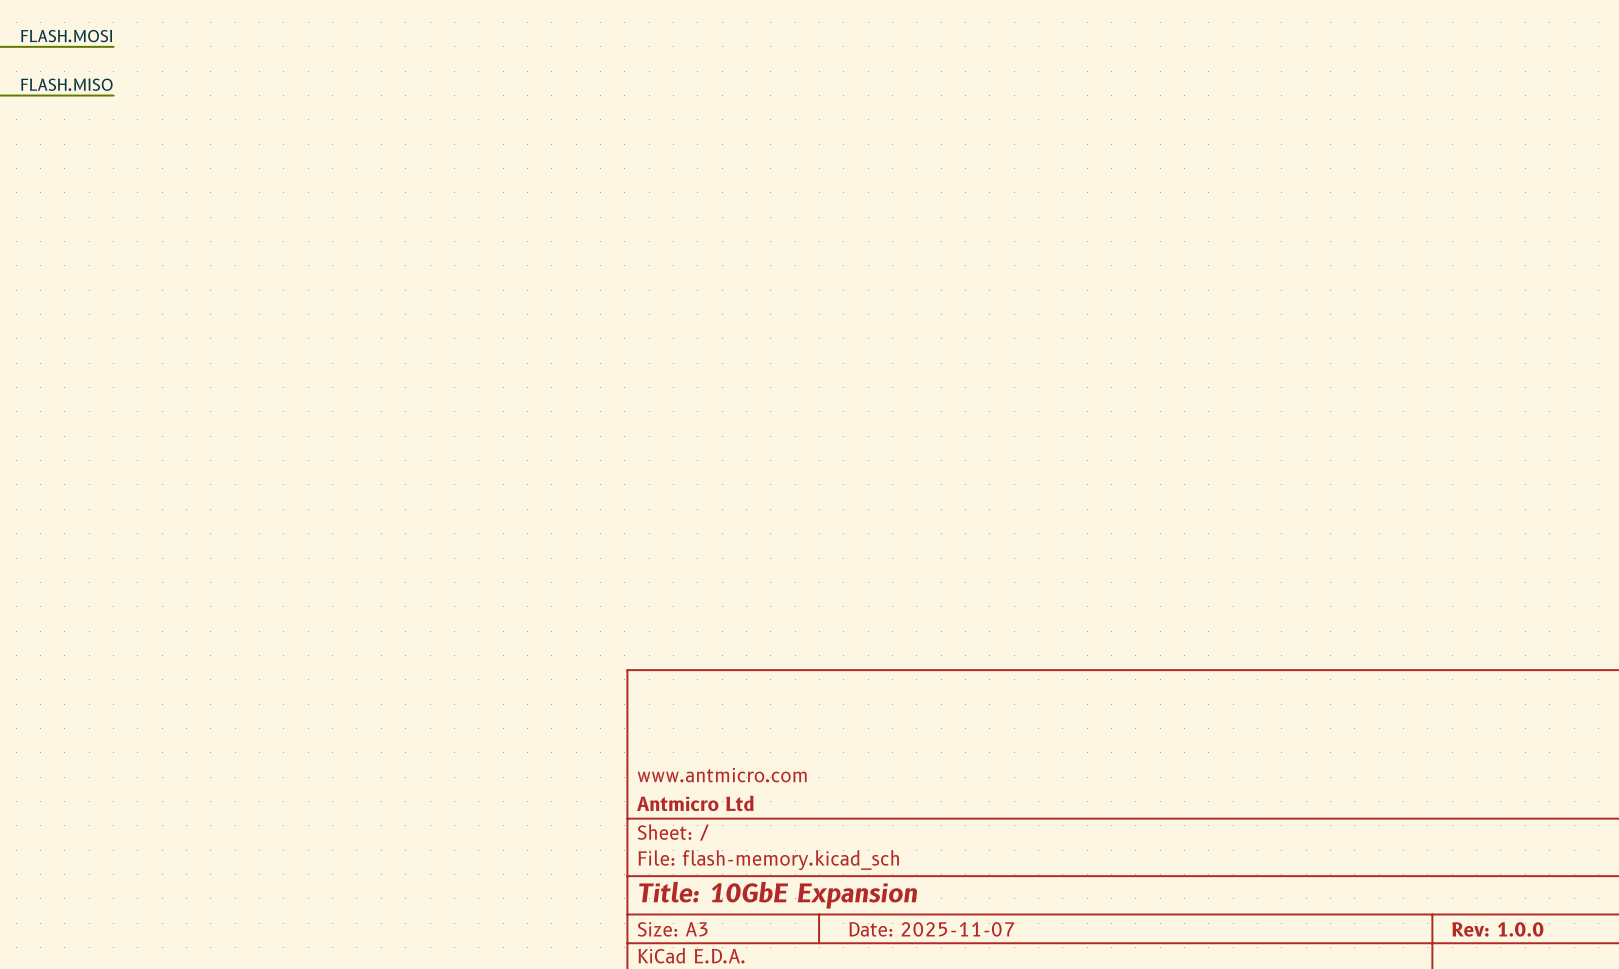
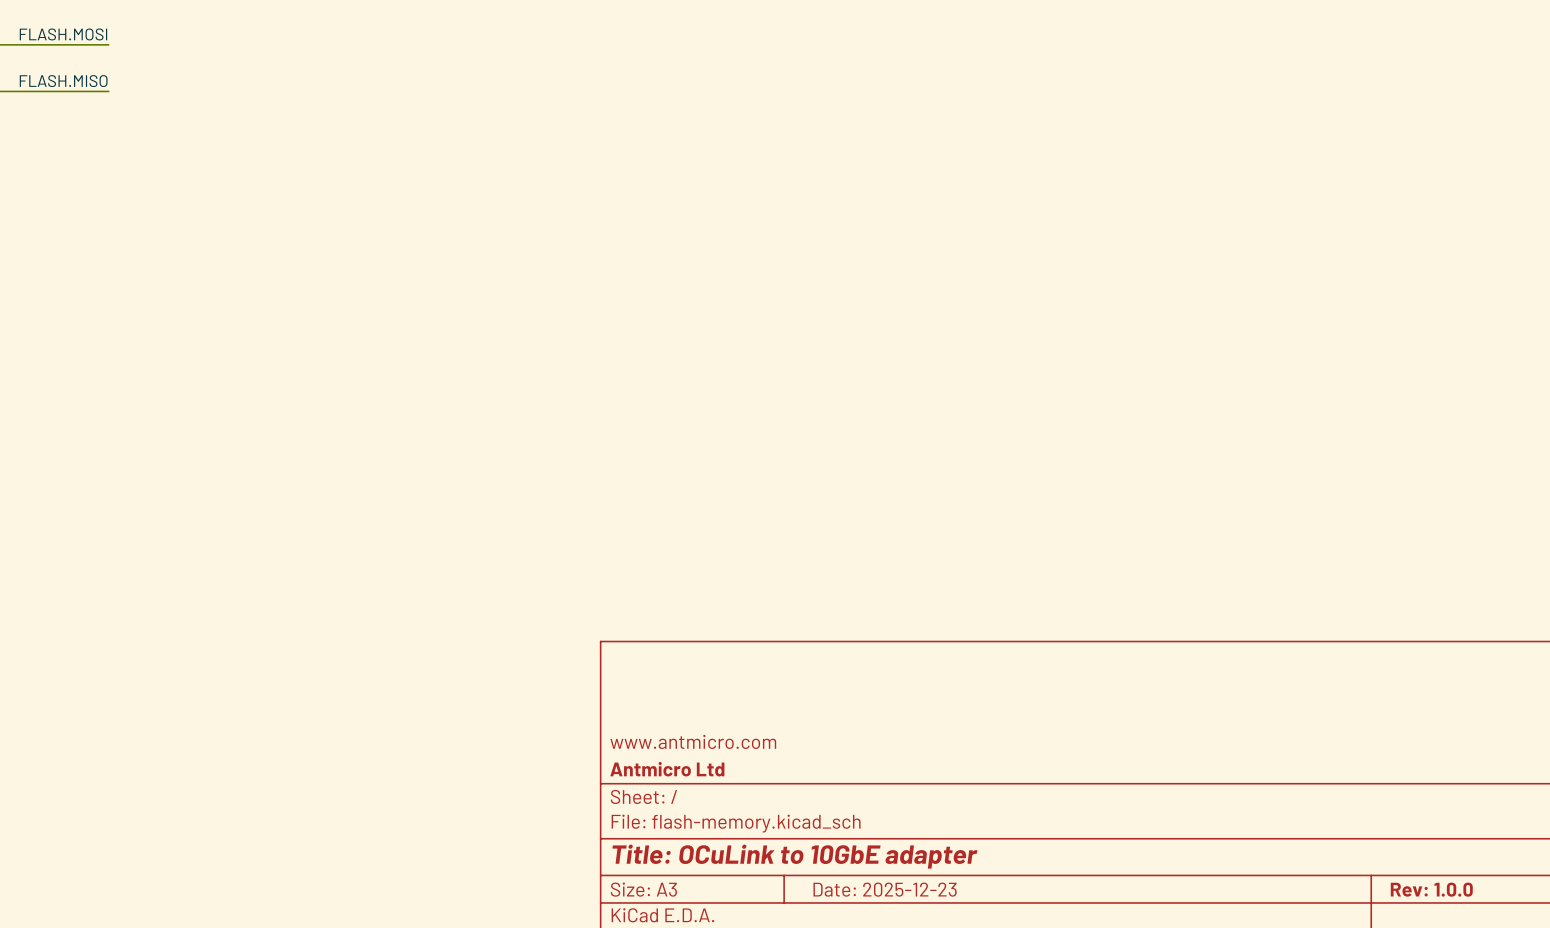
title block: Title: 10GbE Expansion (778, 895) -> Title: OCuLink to 10GbE adapter (795, 856)
title block: Date: 2025-11-07 (931, 929) -> Date: 2025-12-23 (885, 889)

